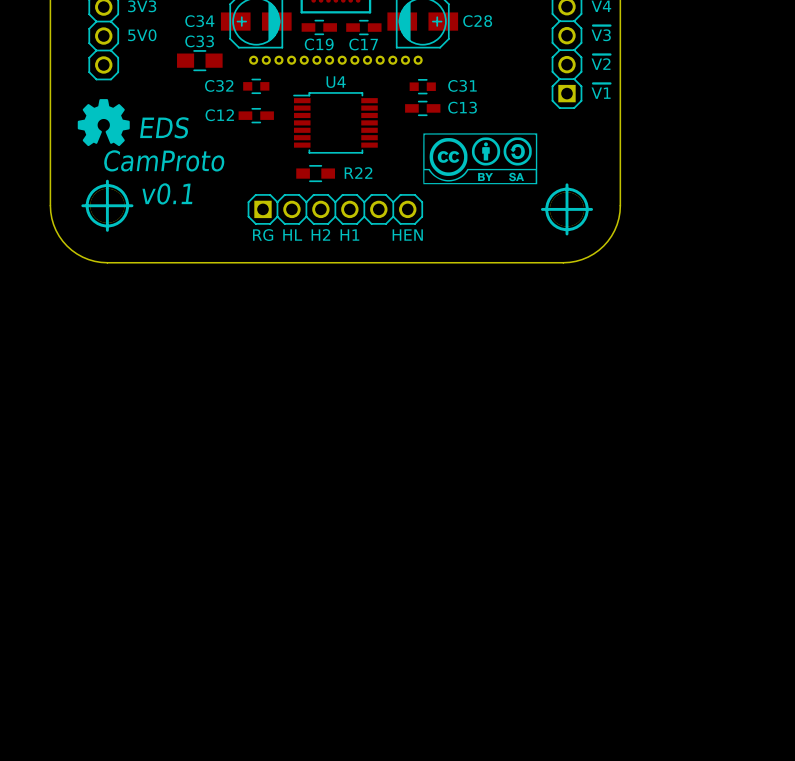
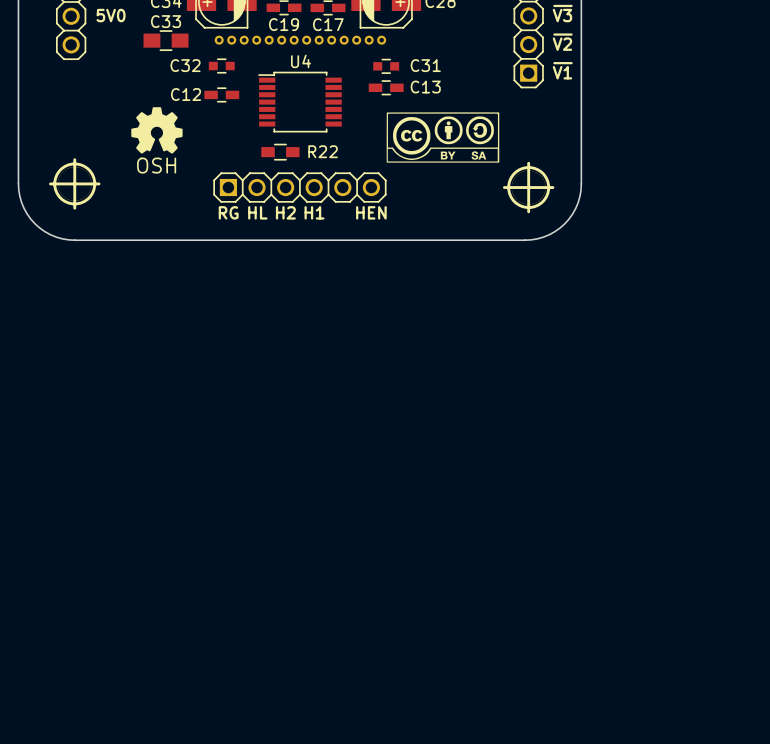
drawing: [77, 99, 130, 147] -> none
text: EDS (164, 127) -> none
drawing: none -> [131, 107, 183, 154]
text: CamProto (164, 160) -> none
text: v0.1 (167, 193) -> none

